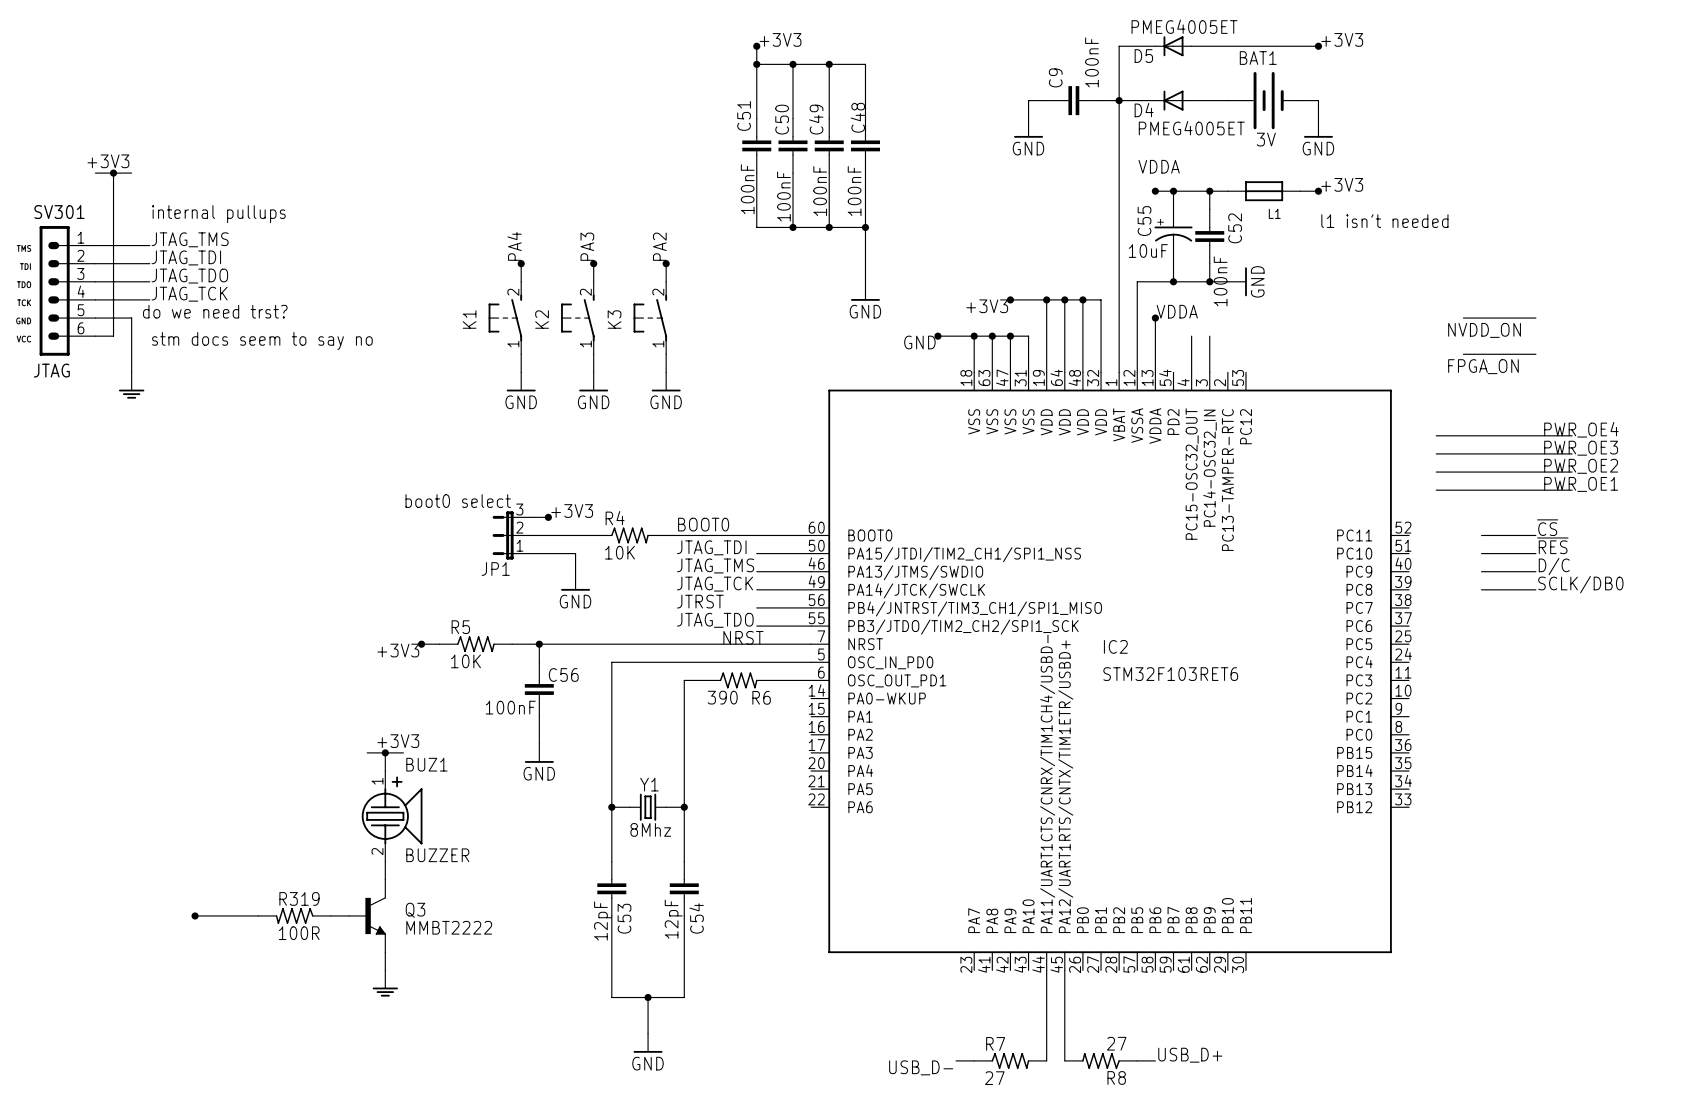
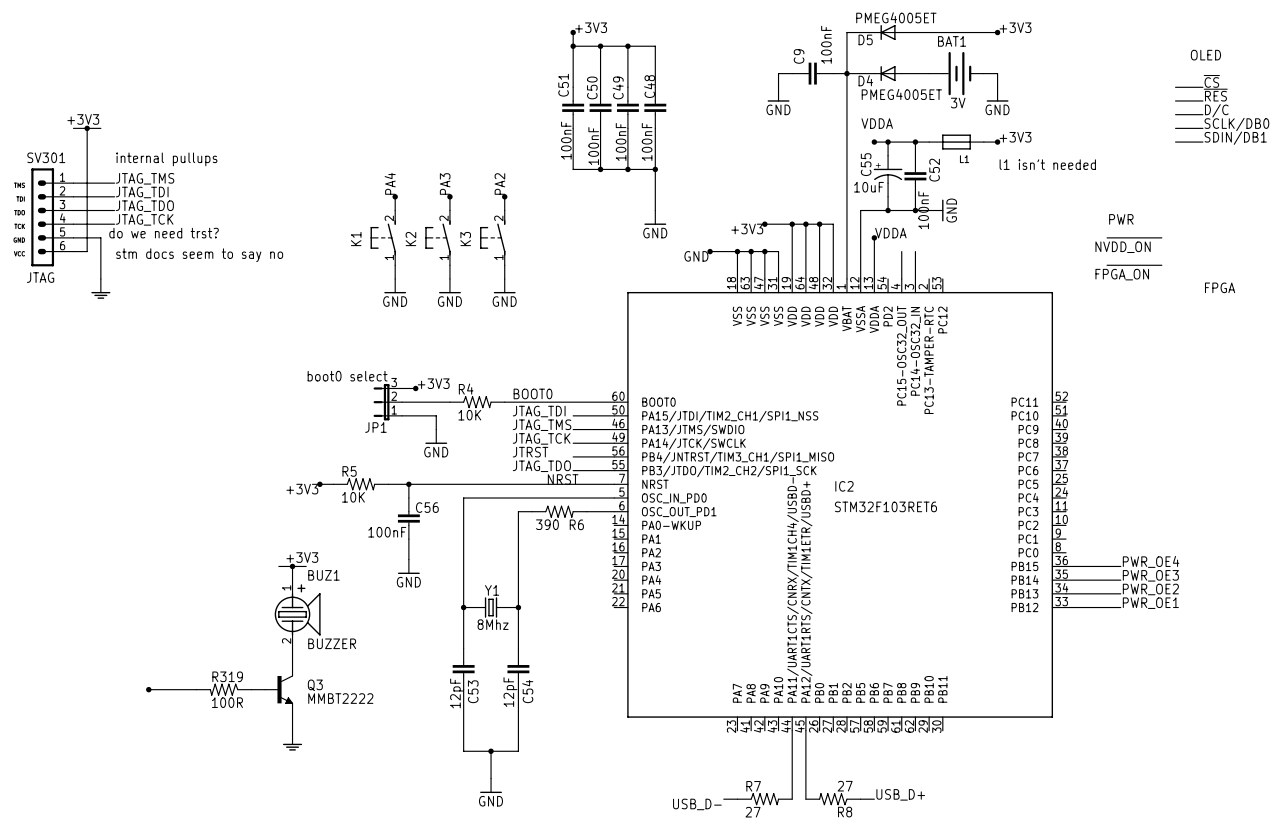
text: none -> OLED (1205, 55)
label: none -> ~{CS} (1211, 81)
wire: none -> (1175, 87) (1202, 87)
label: none -> ~{RES} (1215, 95)
wire: none -> (1175, 100) (1202, 100)
label: none -> D/C (1216, 110)
wire: none -> (1175, 114) (1202, 114)
label: none -> SCLK/DB0 (1236, 124)
wire: none -> (1175, 128) (1202, 128)
label: none -> SDIN/DB1 (1235, 138)
wire: none -> (1175, 142) (1202, 142)
text: none -> PWR (1121, 219)
text: none -> FPGA (1220, 287)
label: PWR_OE4 (1581, 429) -> none
wire: (1436, 435) (1572, 435) -> none
label: PWR_OE3 (1581, 448) -> none
wire: (1436, 453) (1572, 453) -> none
label: PWR_OE2 (1581, 466) -> none
wire: (1436, 472) (1572, 472) -> none
label: PWR_OE1 (1581, 484) -> none
wire: (1436, 490) (1572, 490) -> none
label: ~{CS} (1547, 527) -> none
wire: (1481, 535) (1535, 535) -> none
label: ~{RES} (1552, 545) -> none
wire: (1481, 553) (1535, 553) -> none
label: D/C (1554, 566) -> none
wire: (1481, 571) (1535, 571) -> none
label: SCLK/DB0 (1580, 584) -> none
wire: (1481, 589) (1535, 589) -> none
label: none -> PWR_OE4 (1151, 561)
wire: none -> (1066, 566) (1120, 566)
label: none -> PWR_OE3 (1150, 575)
wire: none -> (1066, 580) (1120, 580)
label: none -> PWR_OE2 (1150, 589)
wire: none -> (1066, 593) (1120, 593)
label: none -> PWR_OE1 (1150, 603)
wire: none -> (1066, 607) (1120, 607)

